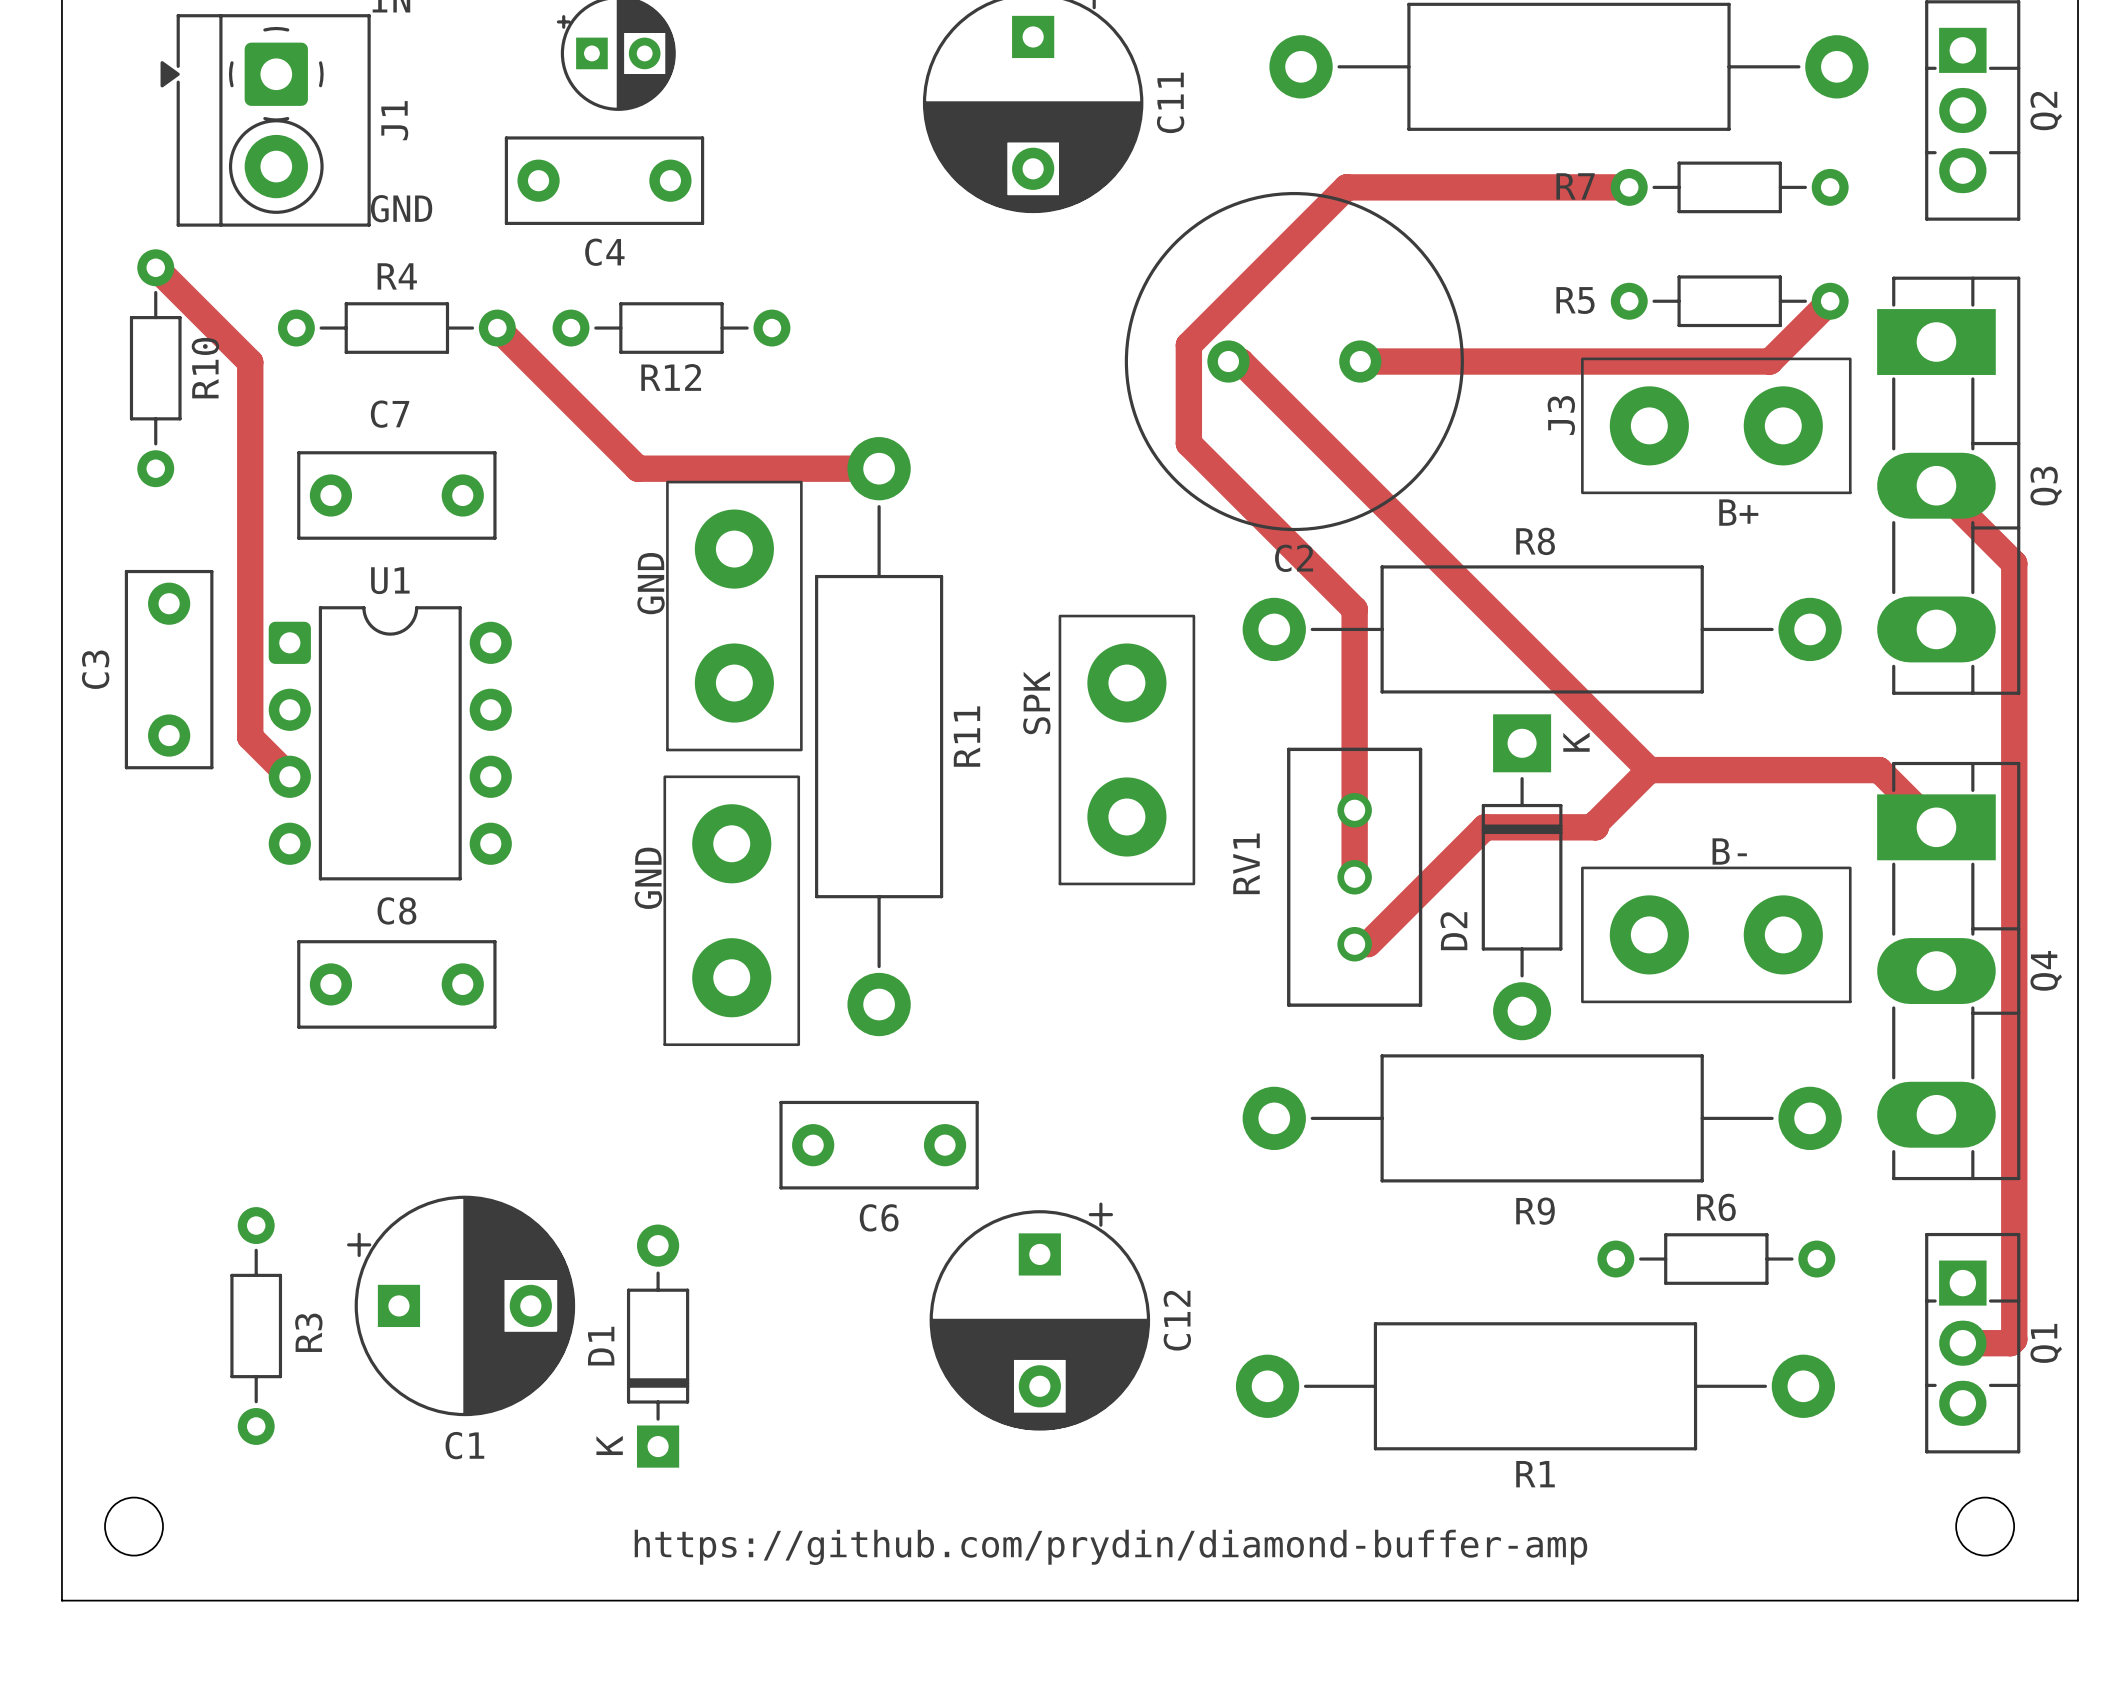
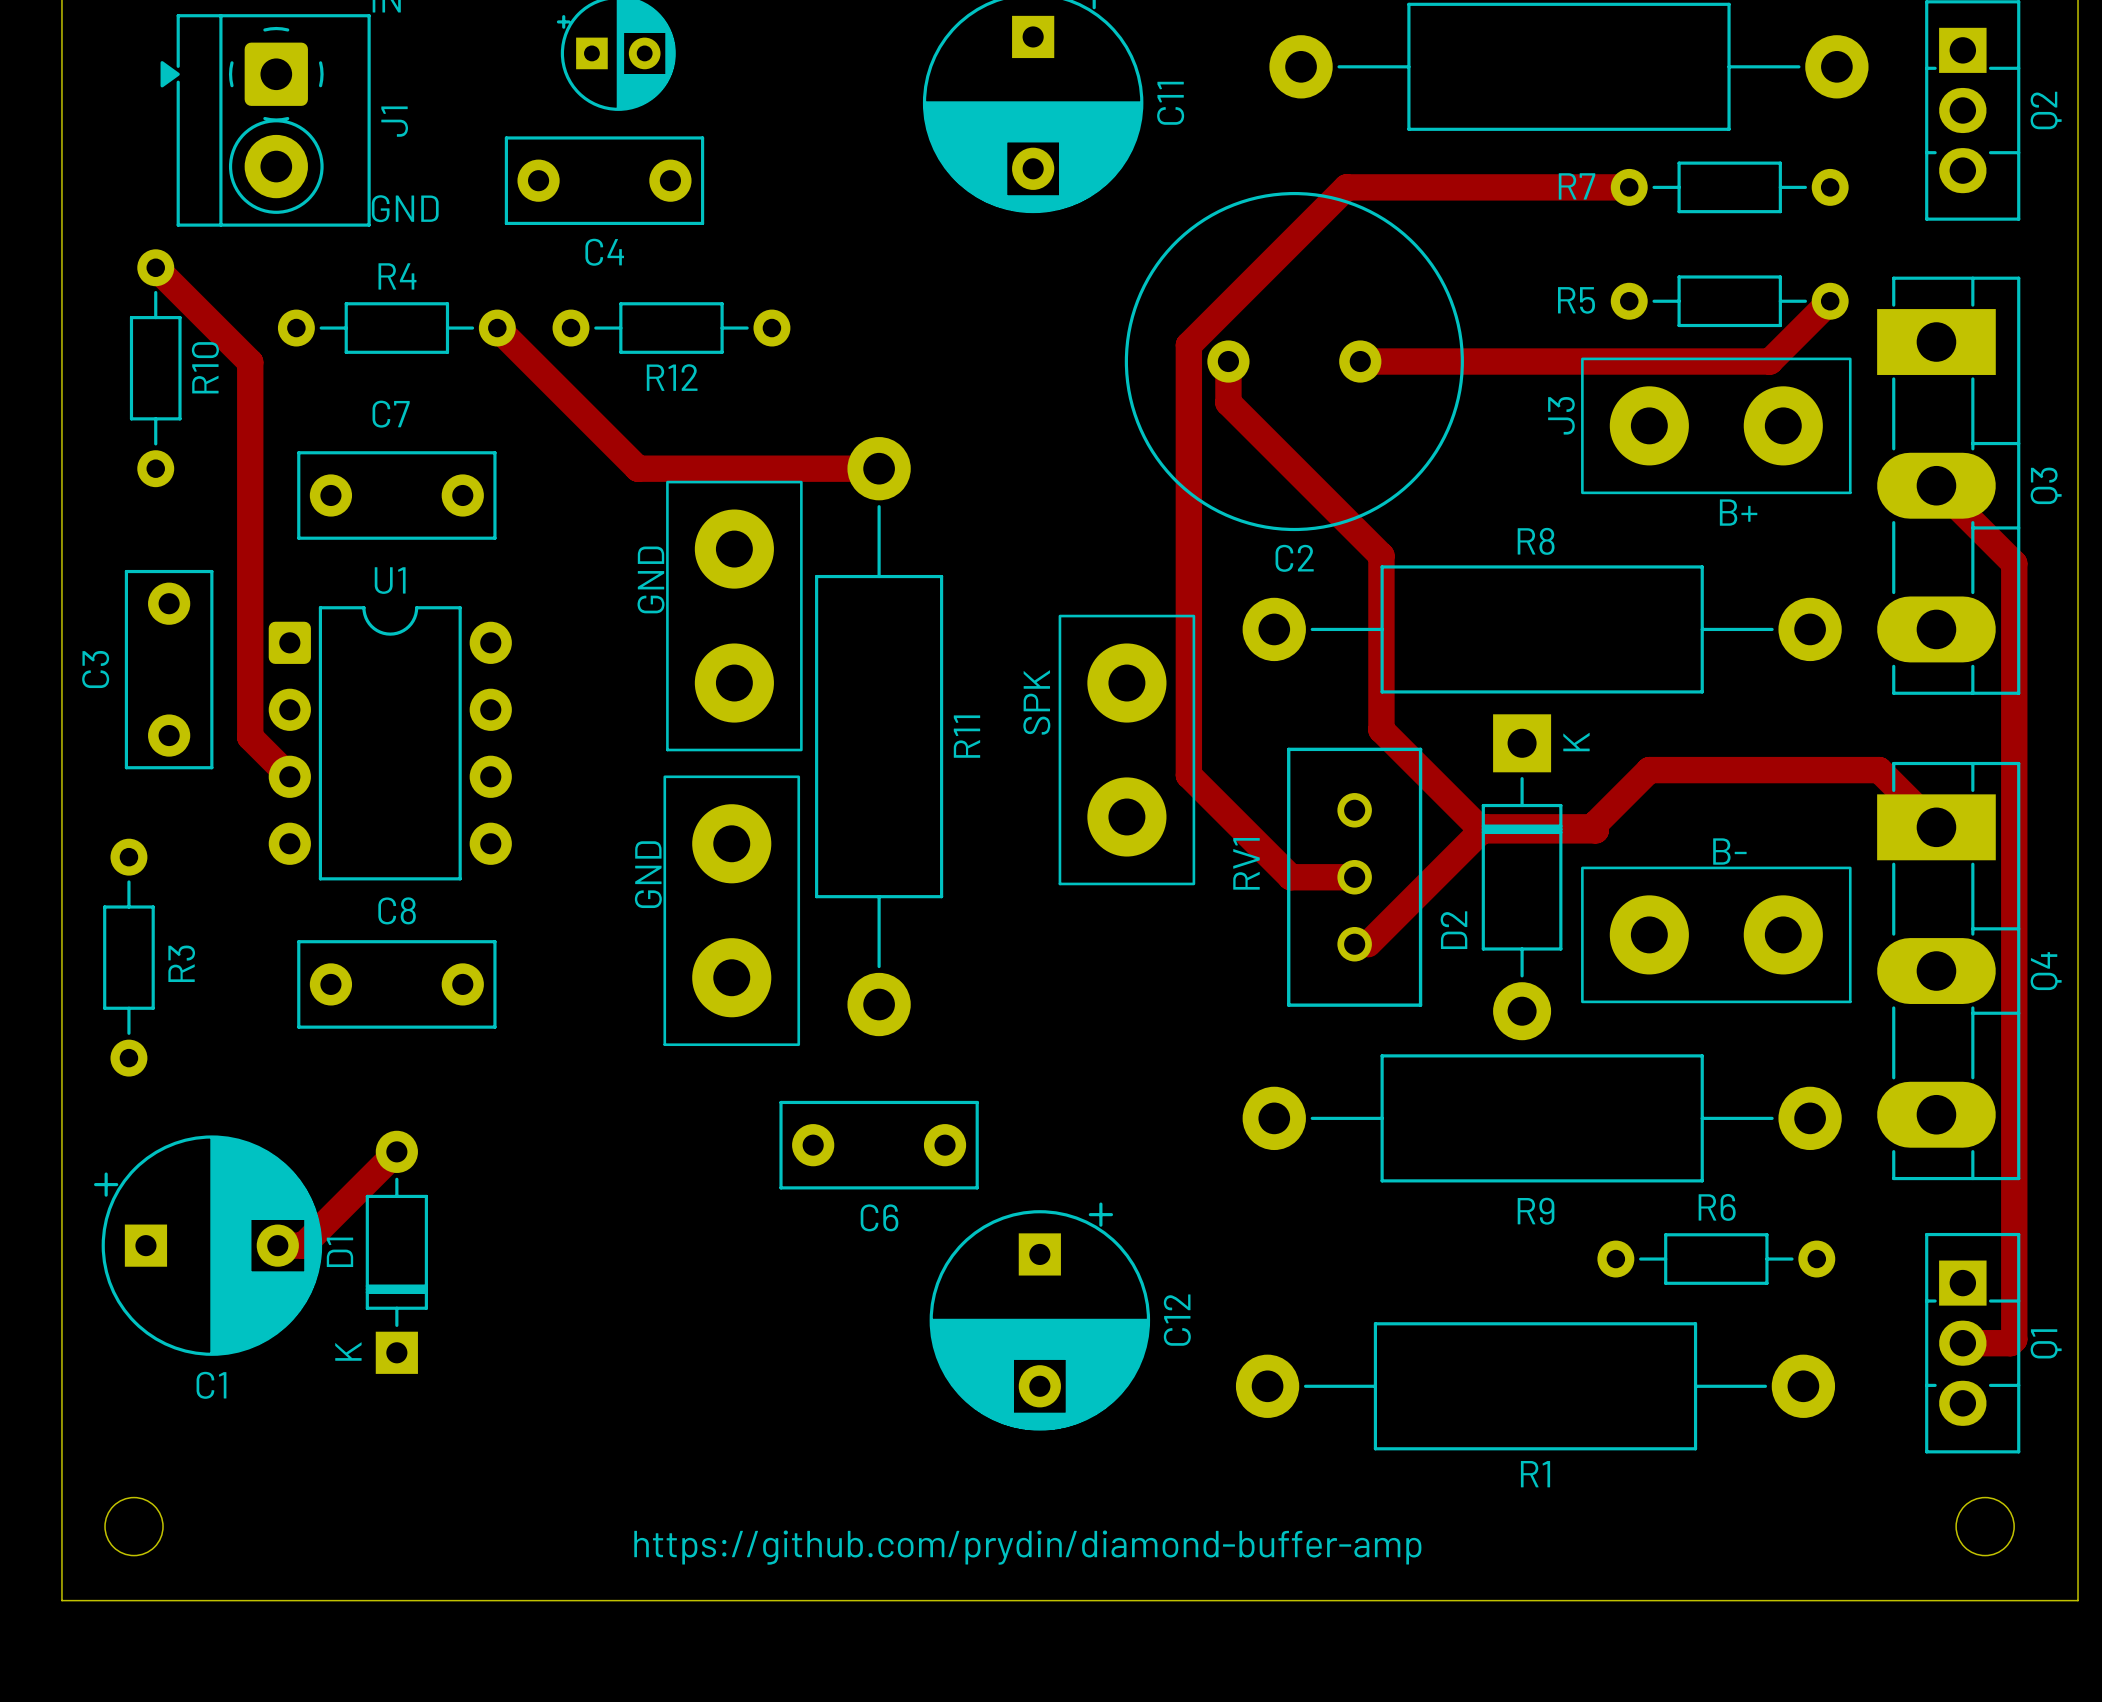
track: (1228, 361) (1240, 361) (1649, 770) -> (1228, 361) (1228, 402) (1381, 555) (1381, 729) (1481, 830) (1595, 830) (1595, 827)
track: (1188, 443) (1354, 609) (1354, 877) -> (1188, 443) (1188, 775) (1290, 877) (1354, 877)
track: none -> (396, 1151) (303, 1245) (277, 1245)
C1 position: (461, 1305) -> (208, 1245)
R3 position: (256, 1326) -> (128, 957)
D1 position: (658, 1346) -> (396, 1252)

